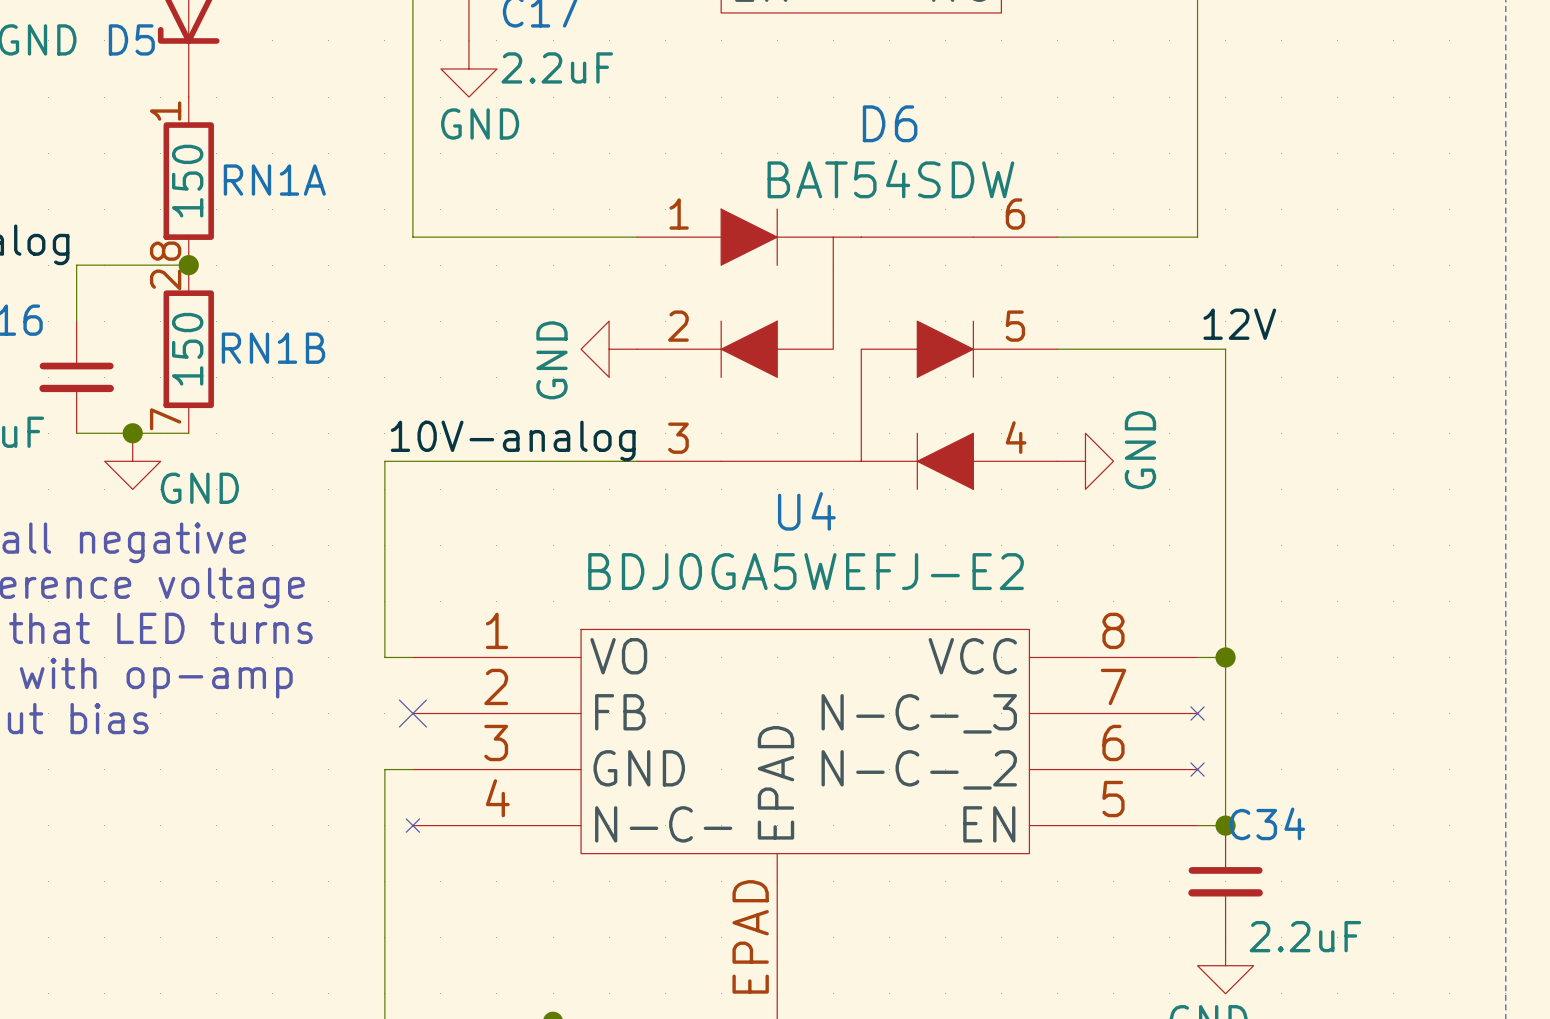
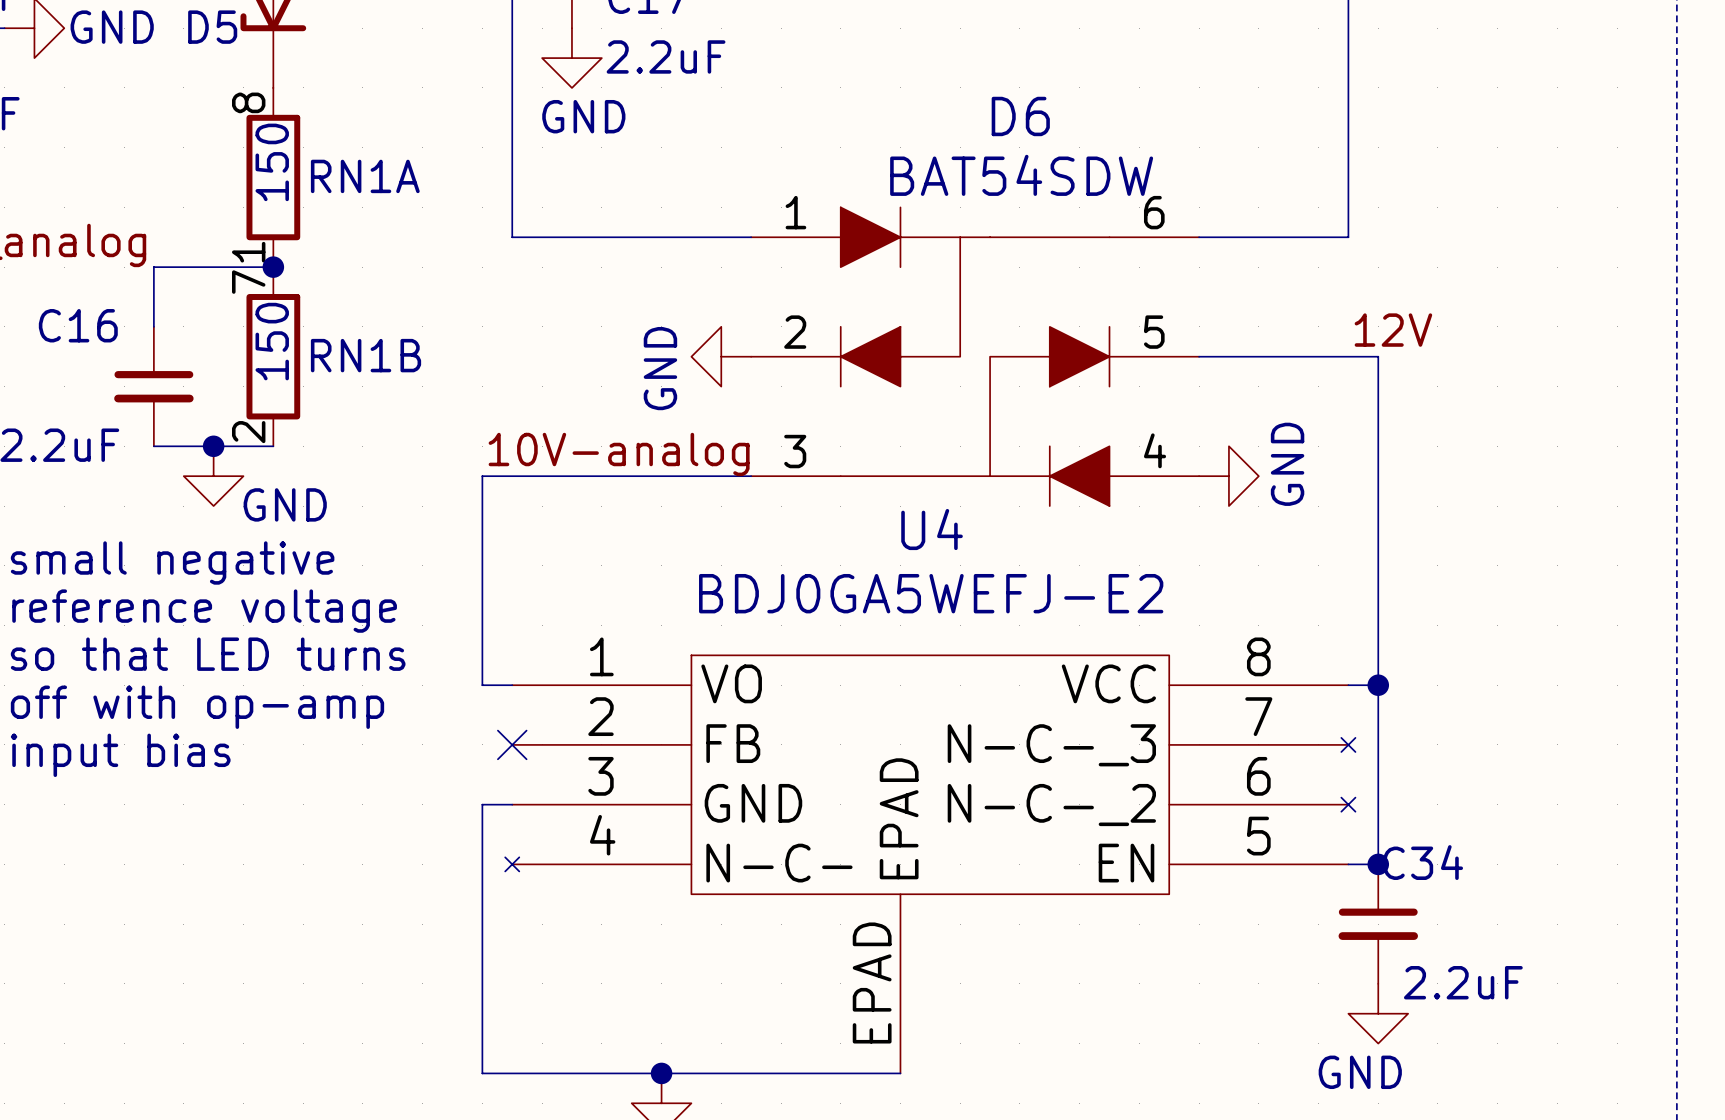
RN1A rotation: 0° (188, 181) -> 180° (273, 177)
RN1B rotation: 0° (188, 349) -> 180° (273, 356)

